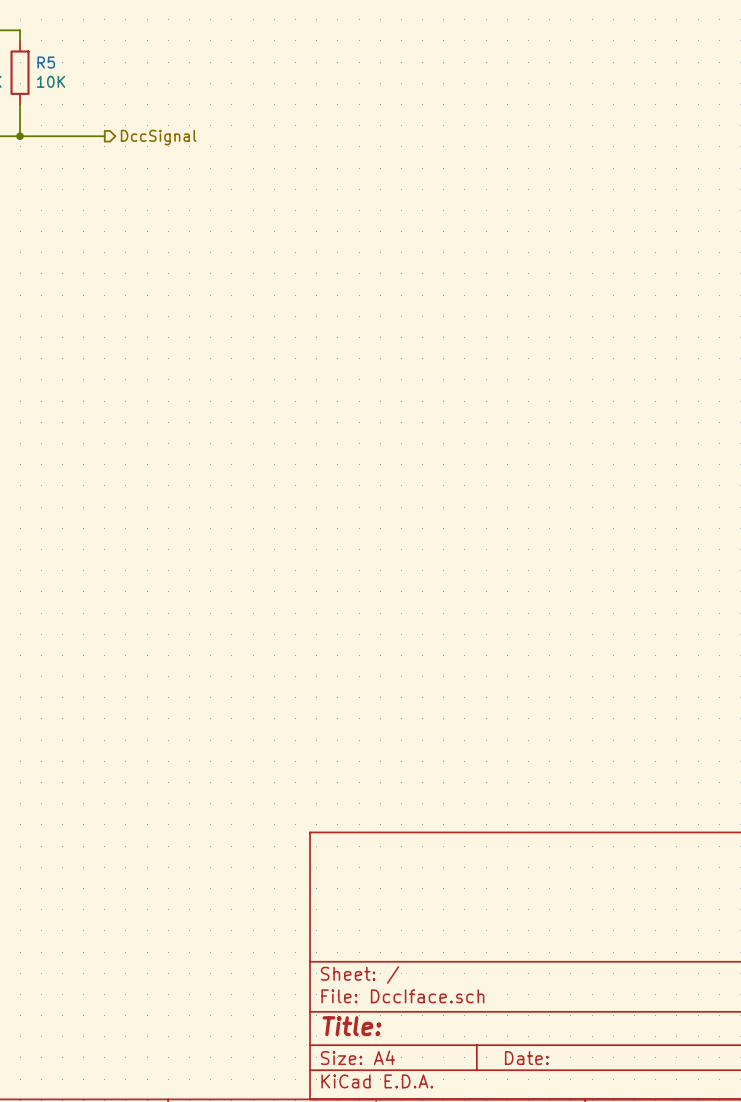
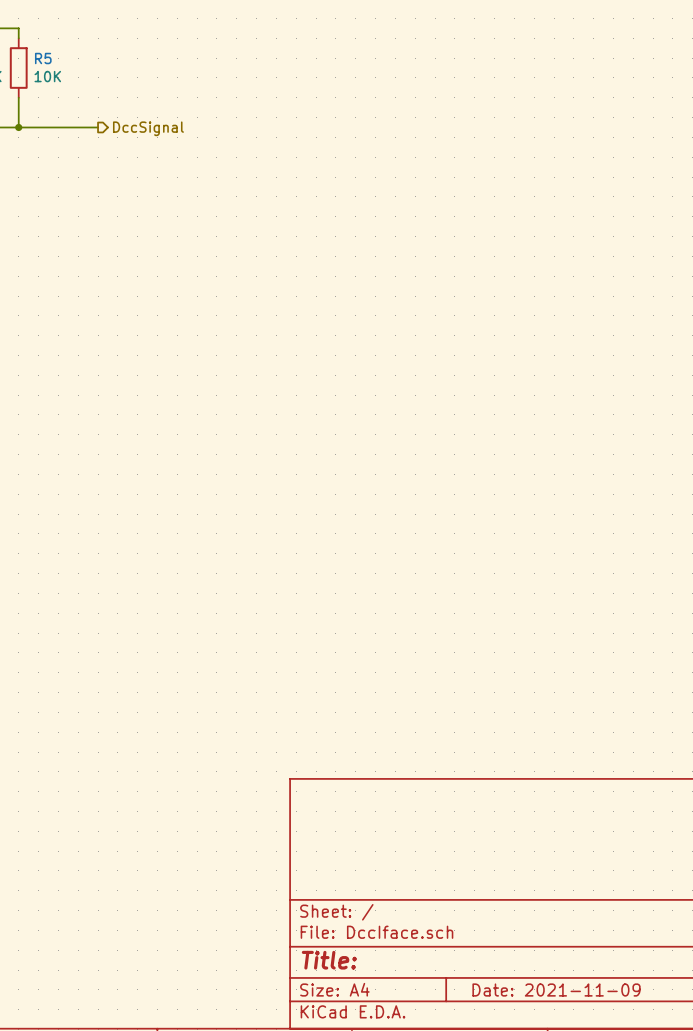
title block: Date: (526, 1058) -> Date: 2021-11-09 (556, 990)

